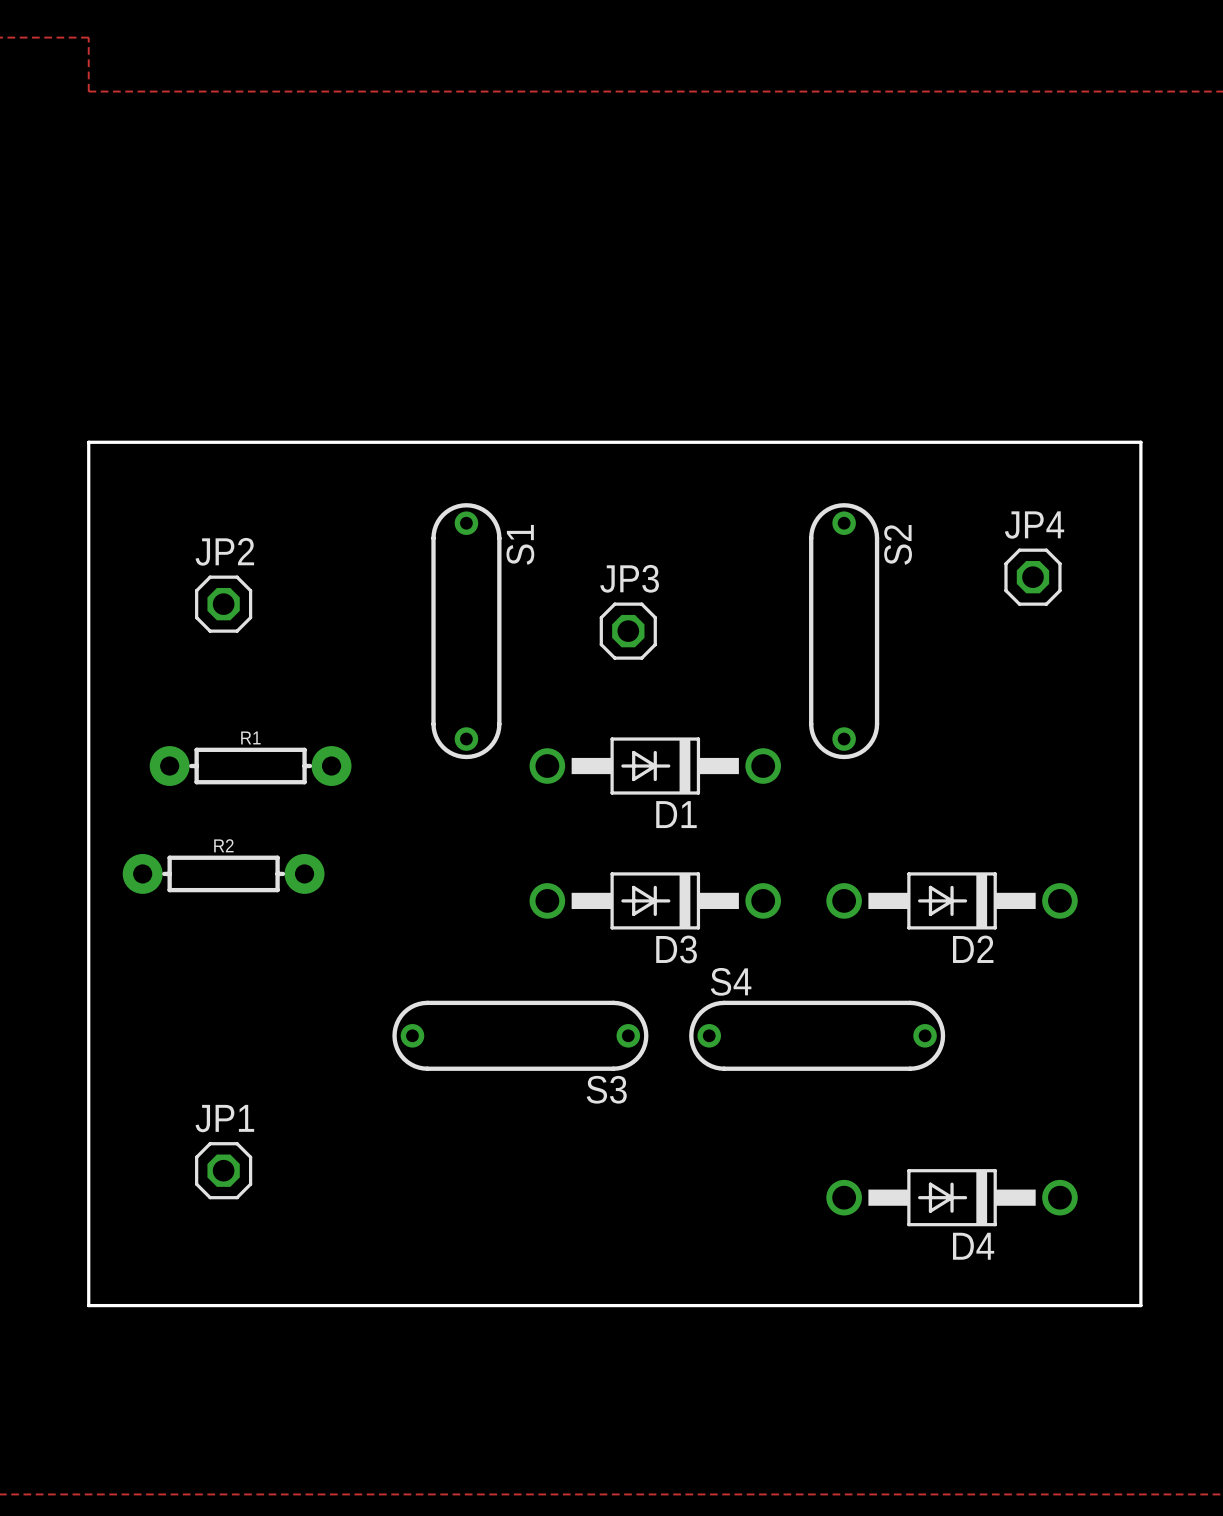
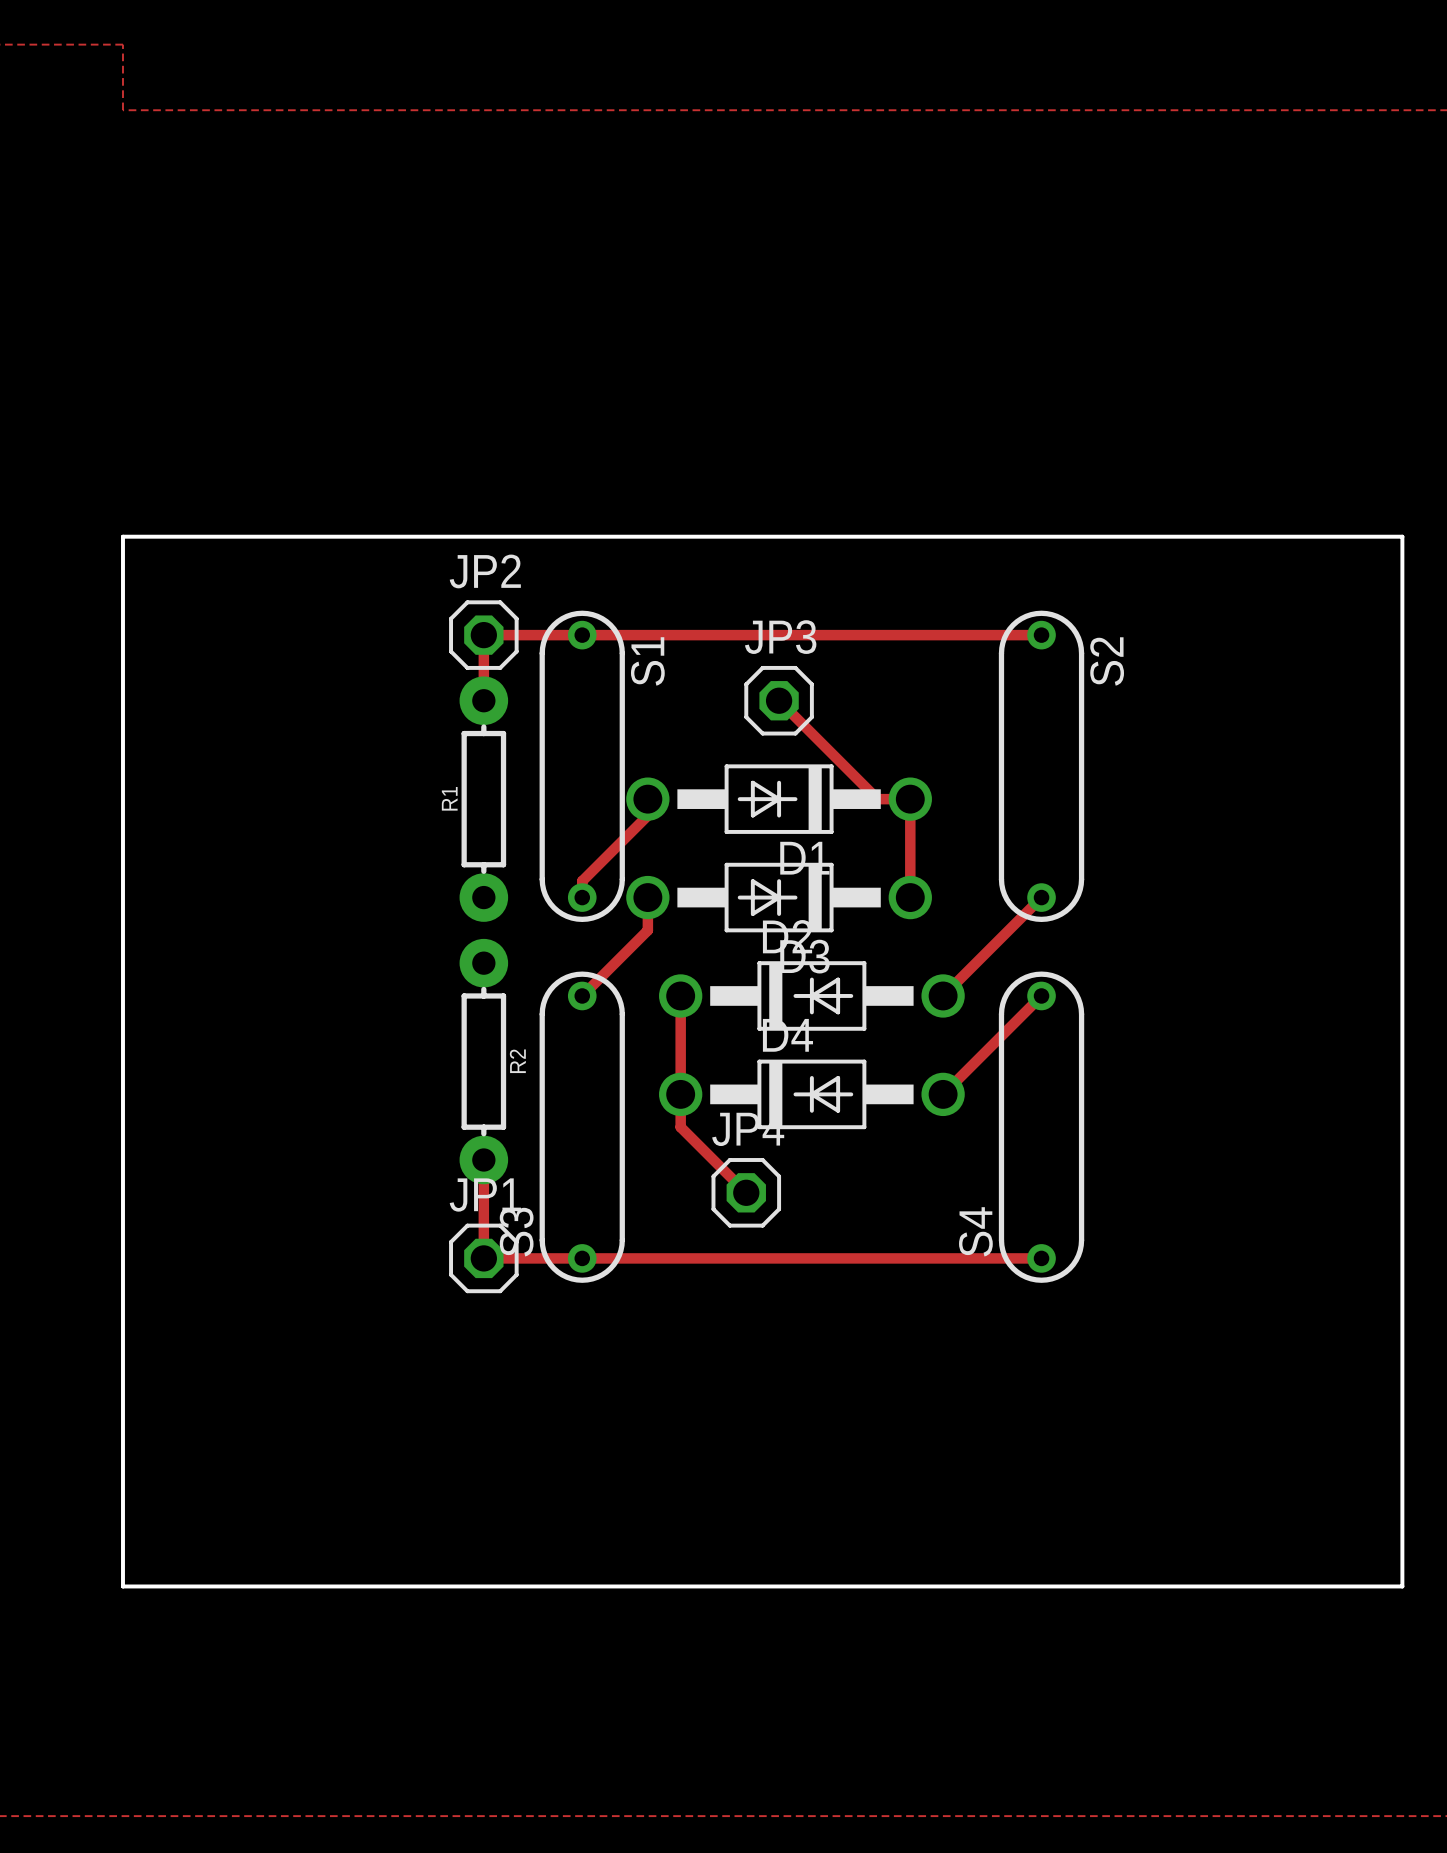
track: none -> (1041, 635) (483, 635) (483, 700)
track: none -> (779, 700) (877, 799) (910, 799) (910, 897)
JP4 position: (1032, 577) -> (746, 1192)
JP2 position: (223, 604) -> (483, 635)
JP3 position: (628, 631) -> (779, 700)
track: none -> (647, 799) (647, 815) (582, 881) (582, 897)
track: none -> (647, 897) (647, 930) (582, 995)
track: none -> (1041, 897) (943, 995)
R1 rotation: 0° (250, 766) -> 90° clockwise (483, 799)
R1 position: (250, 766) -> (483, 799)
D1 position: (655, 766) -> (779, 799)
track: none -> (680, 995) (680, 1127) (746, 1192)
track: none -> (1041, 995) (943, 1094)
R2 rotation: 0° (223, 873) -> 90° clockwise (483, 1061)
R2 position: (223, 873) -> (483, 1061)
D3 position: (655, 900) -> (779, 897)
D2 rotation: 0° (952, 900) -> 180° (811, 995)
D2 position: (952, 900) -> (811, 995)
track: none -> (483, 1160) (483, 1258) (1041, 1258)
S4 name position: S4 (731, 981) -> S4 (975, 1231)
S3 rotation: 0° (520, 1035) -> 90° clockwise (582, 1127)
S4 rotation: 0° (817, 1035) -> 90° clockwise (1041, 1127)
JP1 position: (223, 1170) -> (483, 1258)
D4 rotation: 0° (952, 1197) -> 180° (811, 1094)
D4 position: (952, 1197) -> (811, 1094)

